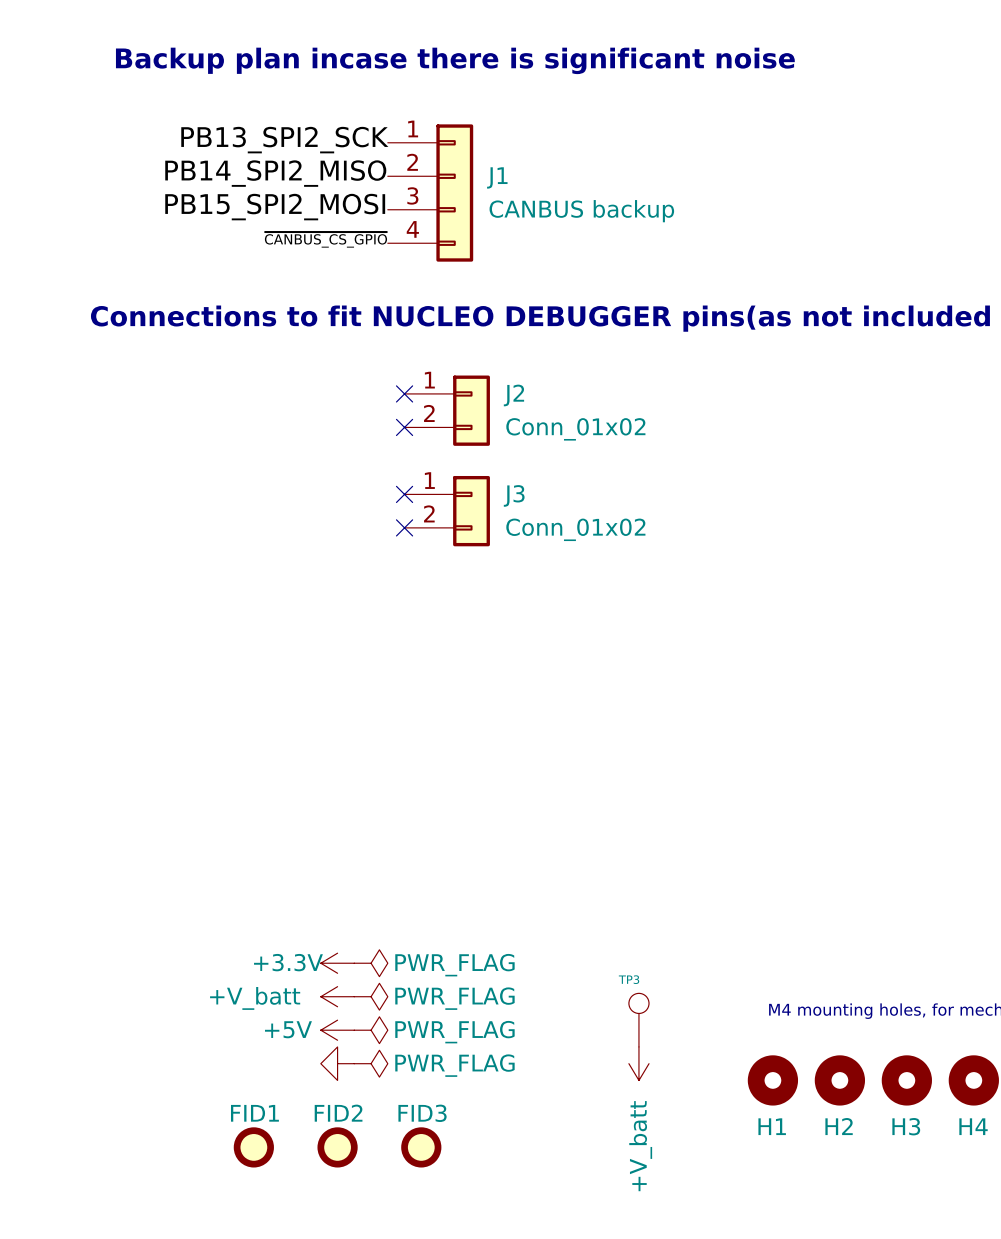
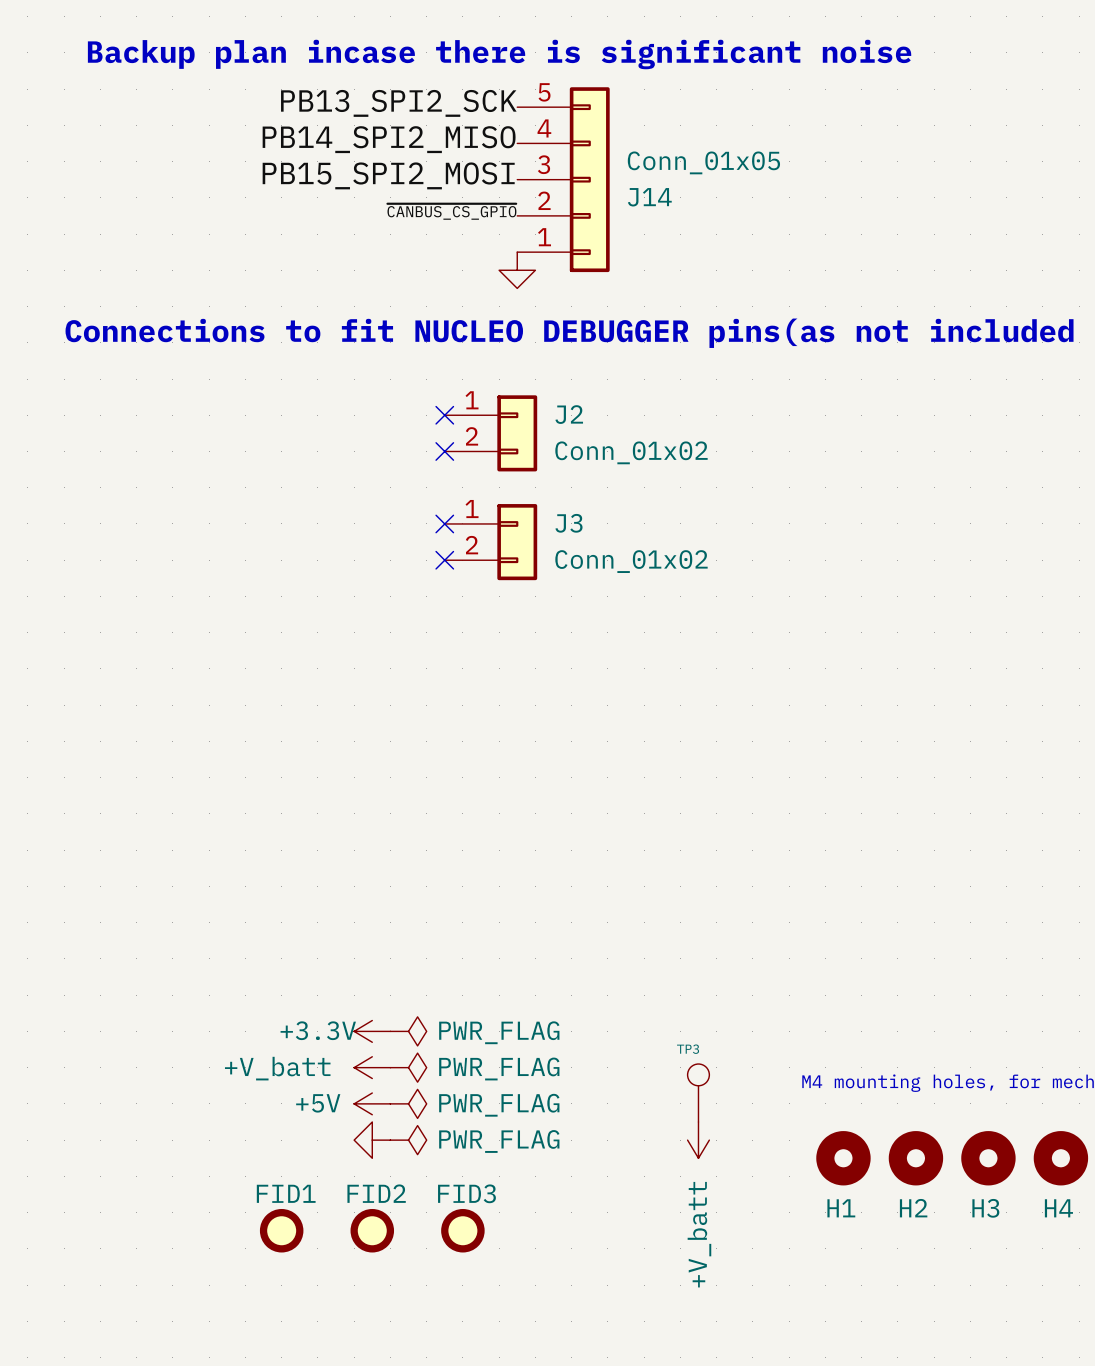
label position: PB13_SPI2_SCK (284, 140) -> PB13_SPI2_SCK (398, 103)
label position: PB14_SPI2_MISO (275, 173) -> PB14_SPI2_MISO (389, 139)
J14: none -> Conn_01x05 (563, 179)
J1: CANBUS backup (430, 193) -> none
label position: PB15_SPI2_MOSI (275, 207) -> PB15_SPI2_MOSI (388, 175)
label position: ~{CANBUS_CS_GPIO} (325, 239) -> ~{CANBUS_CS_GPIO} (451, 211)
power symbol: none -> (517, 270)

